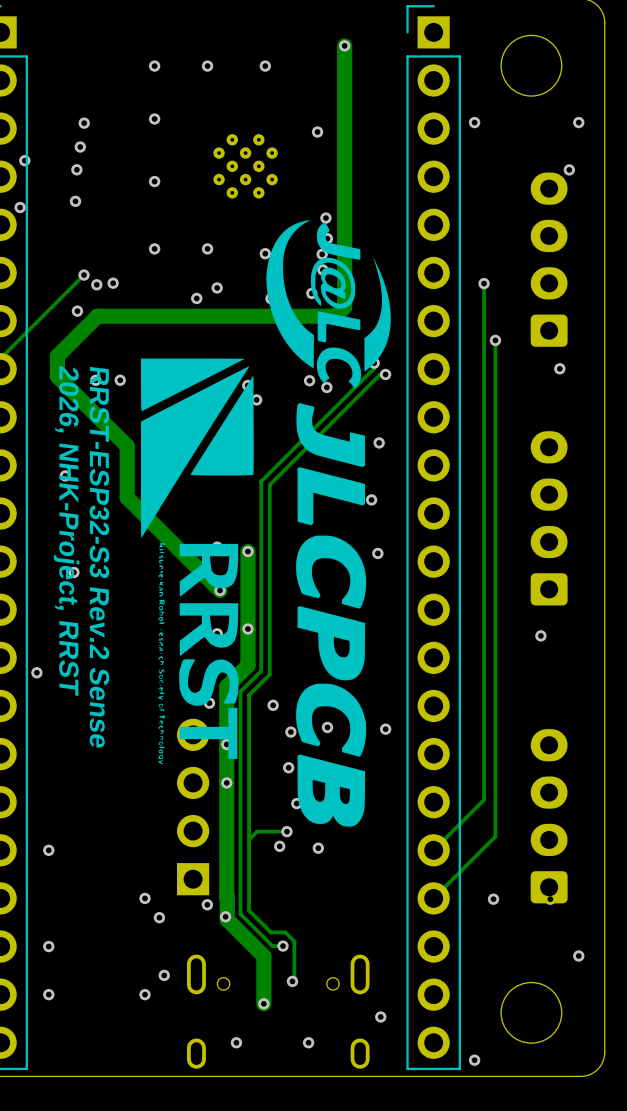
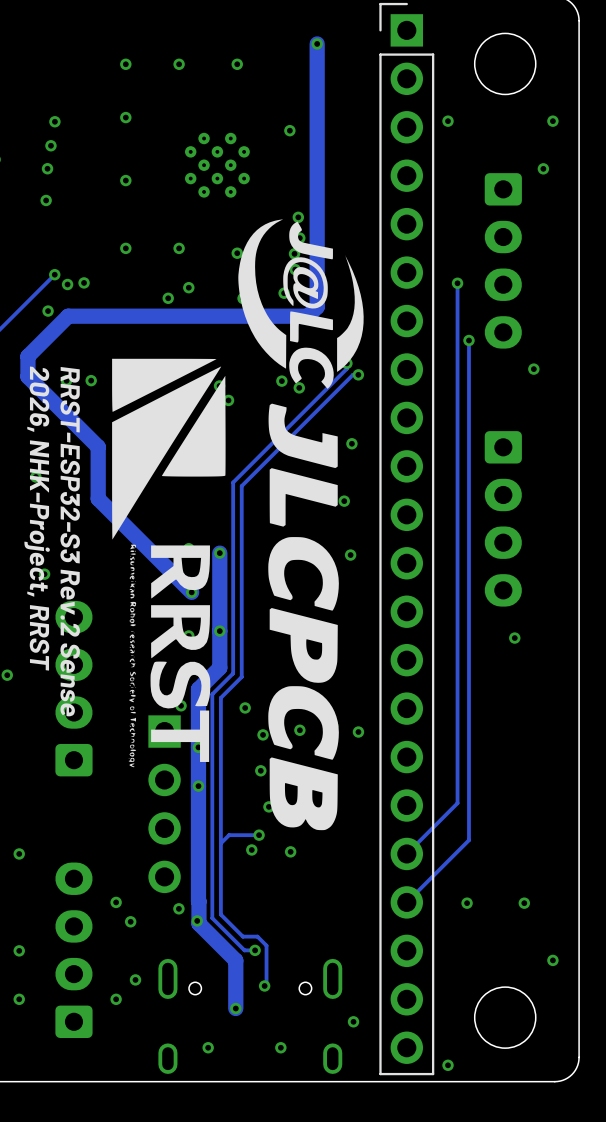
part rotation: 0° (549, 259) -> 180° (503, 260)
part rotation: 0° (549, 518) -> 180° (503, 518)
part: none -> (73, 688)
part rotation: 0° (193, 807) -> 180° (164, 804)
part: (549, 816) -> none
part: none -> (73, 950)

